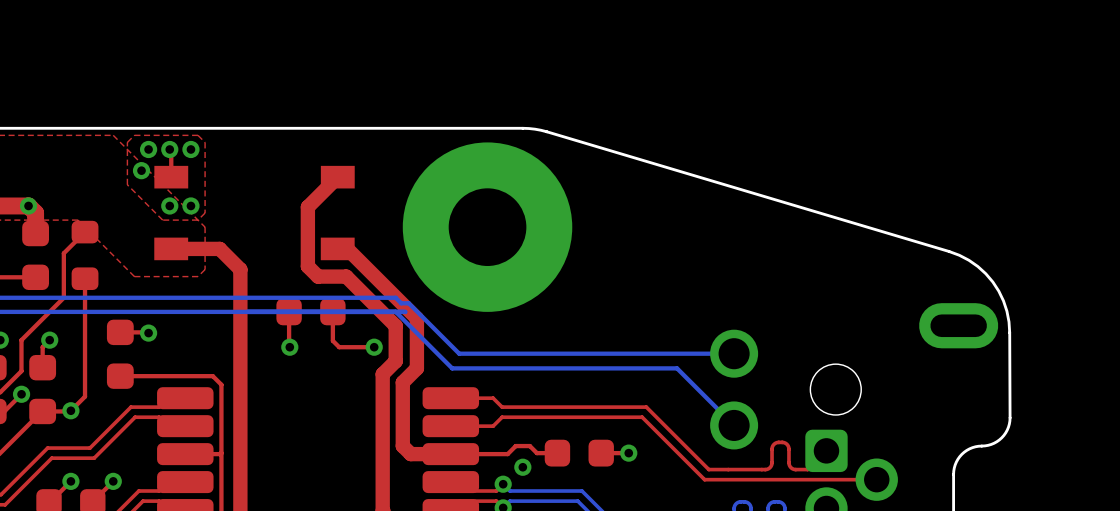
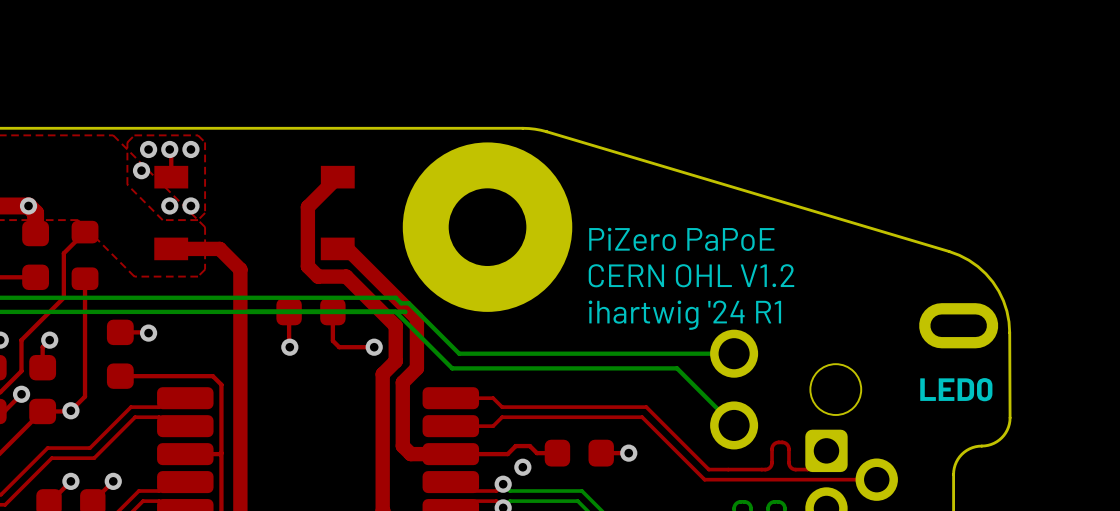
text: none -> PiZero PaPoE (681, 239)
text: none -> CERN OHL V1.2 (691, 275)
text: none -> ihartwig '24 R1 (684, 315)
text: none -> LED0 (956, 389)

